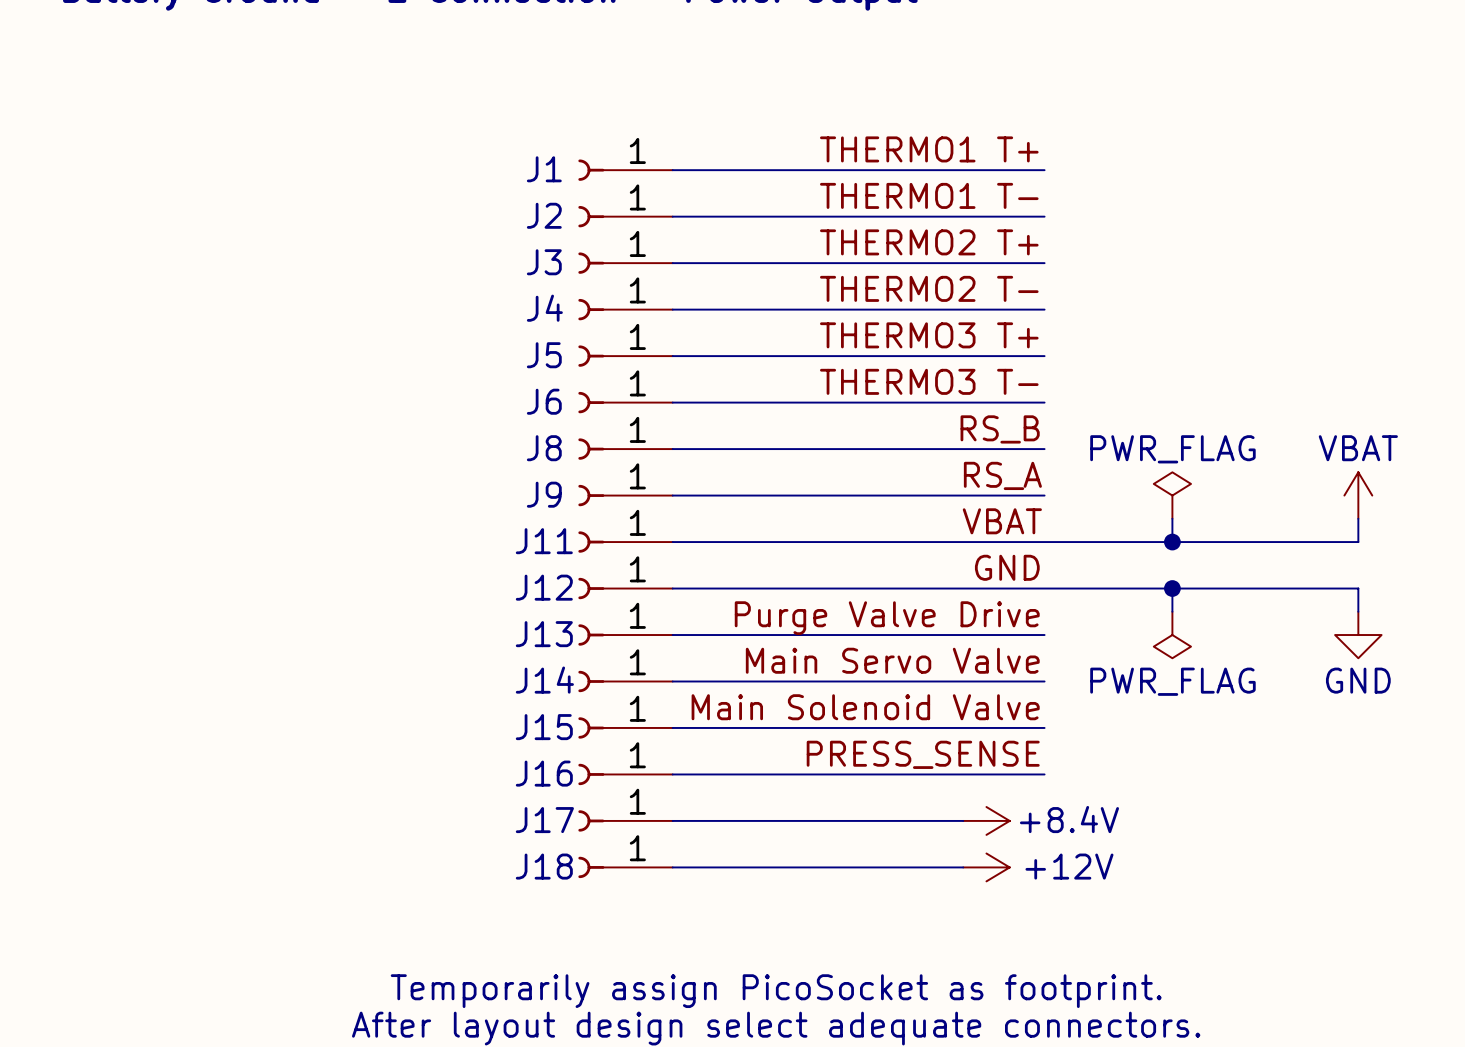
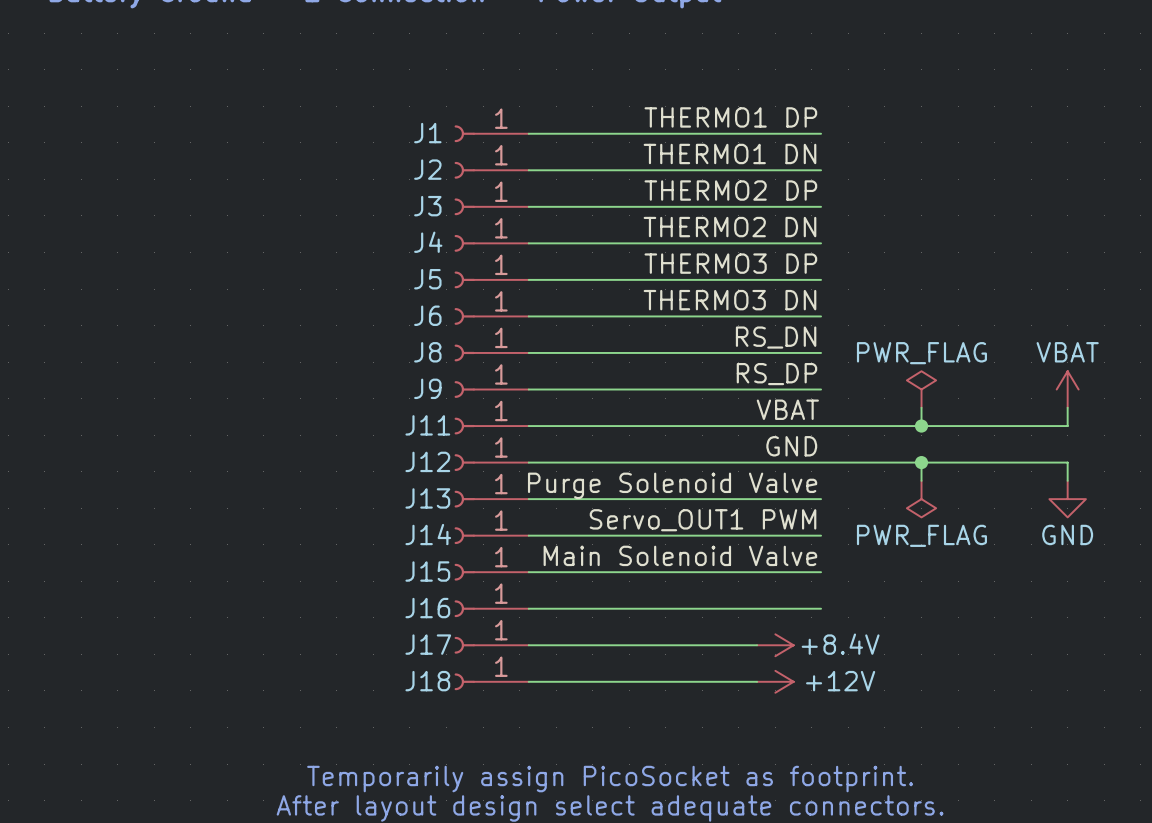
label: THERMO1 T+ (929, 149) -> THERMO1 DP (730, 117)
label: THERMO1 T- (929, 195) -> THERMO1 DN (729, 153)
label: THERMO2 T+ (929, 242) -> THERMO2 DP (730, 190)
label: THERMO2 T- (929, 288) -> THERMO2 DN (729, 227)
label: THERMO3 T+ (929, 335) -> THERMO3 DP (730, 263)
label: THERMO3 T- (929, 381) -> THERMO3 DN (729, 300)
label: RS_B (1000, 429) -> RS_DN (776, 337)
label: RS_A (1002, 475) -> RS_DP (776, 374)
label: Purge Valve Drive (887, 618) -> Purge Solenoid Valve (672, 485)
label: Main Servo Valve (892, 660) -> Servo_OUT1 PWM (703, 520)
label: PRESS_SENSE (923, 754) -> none

